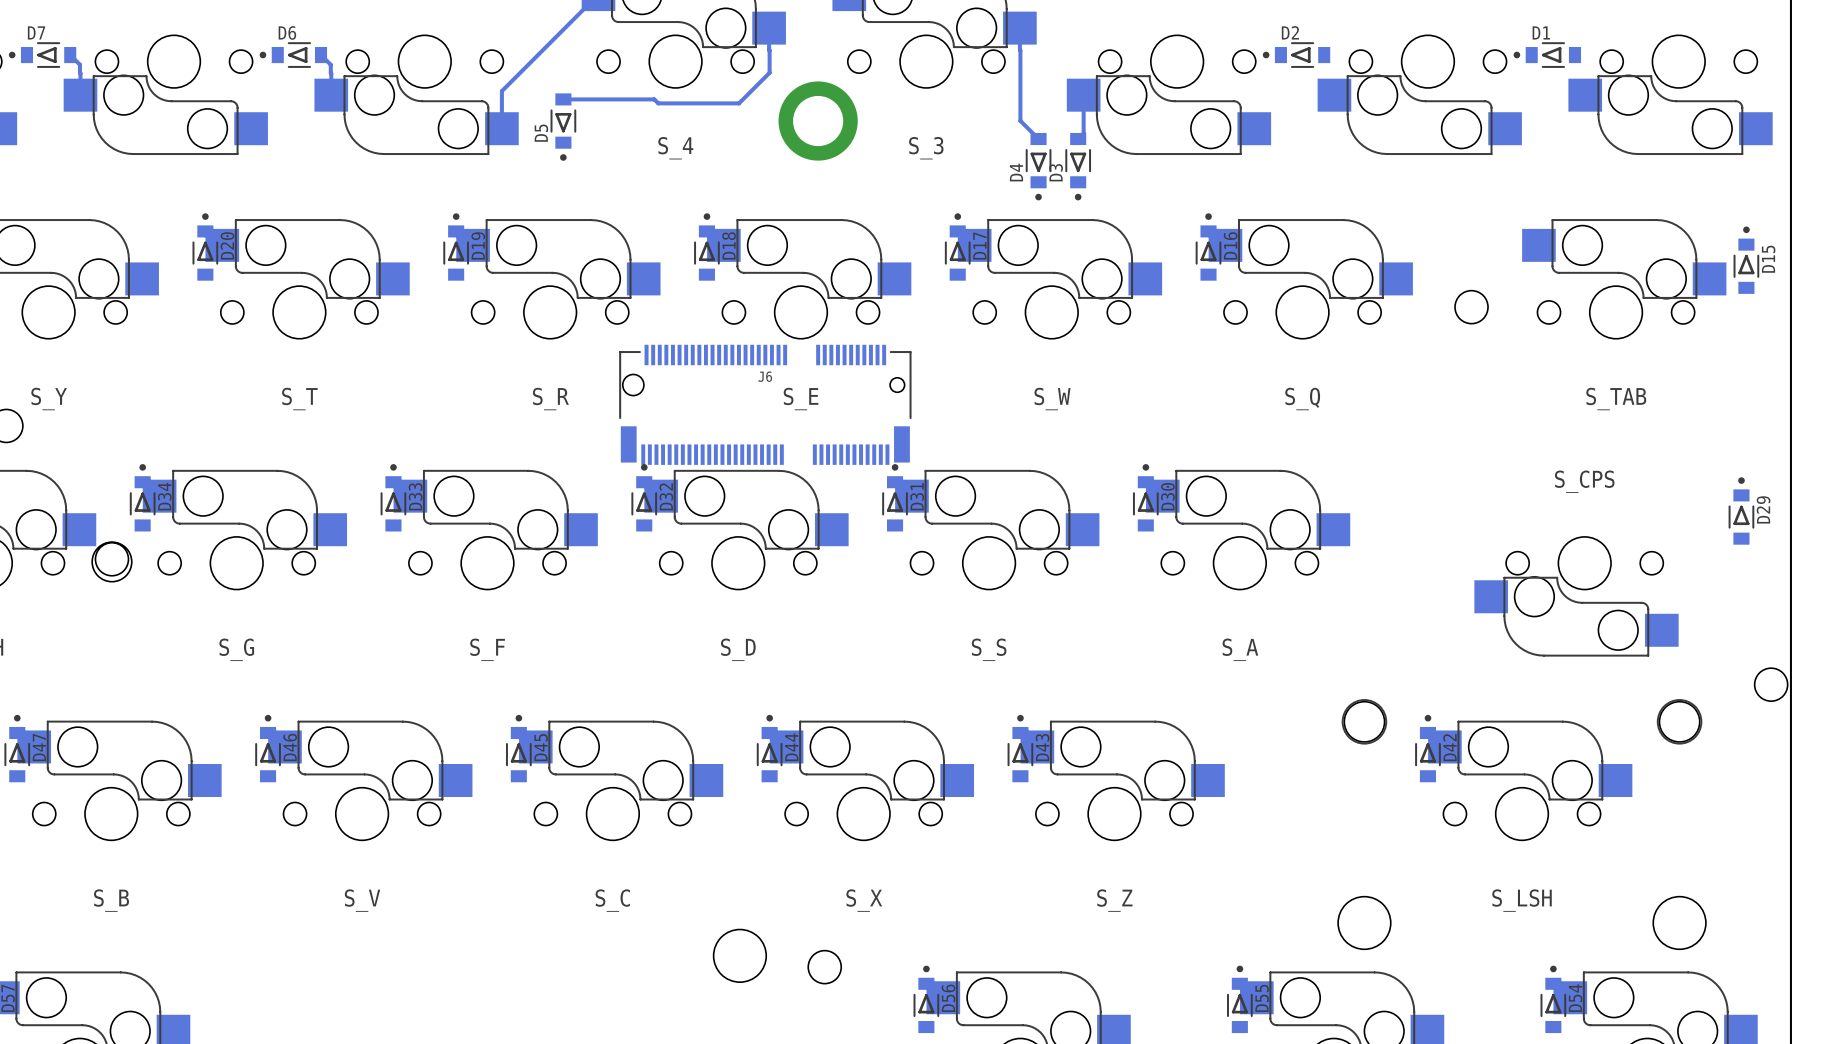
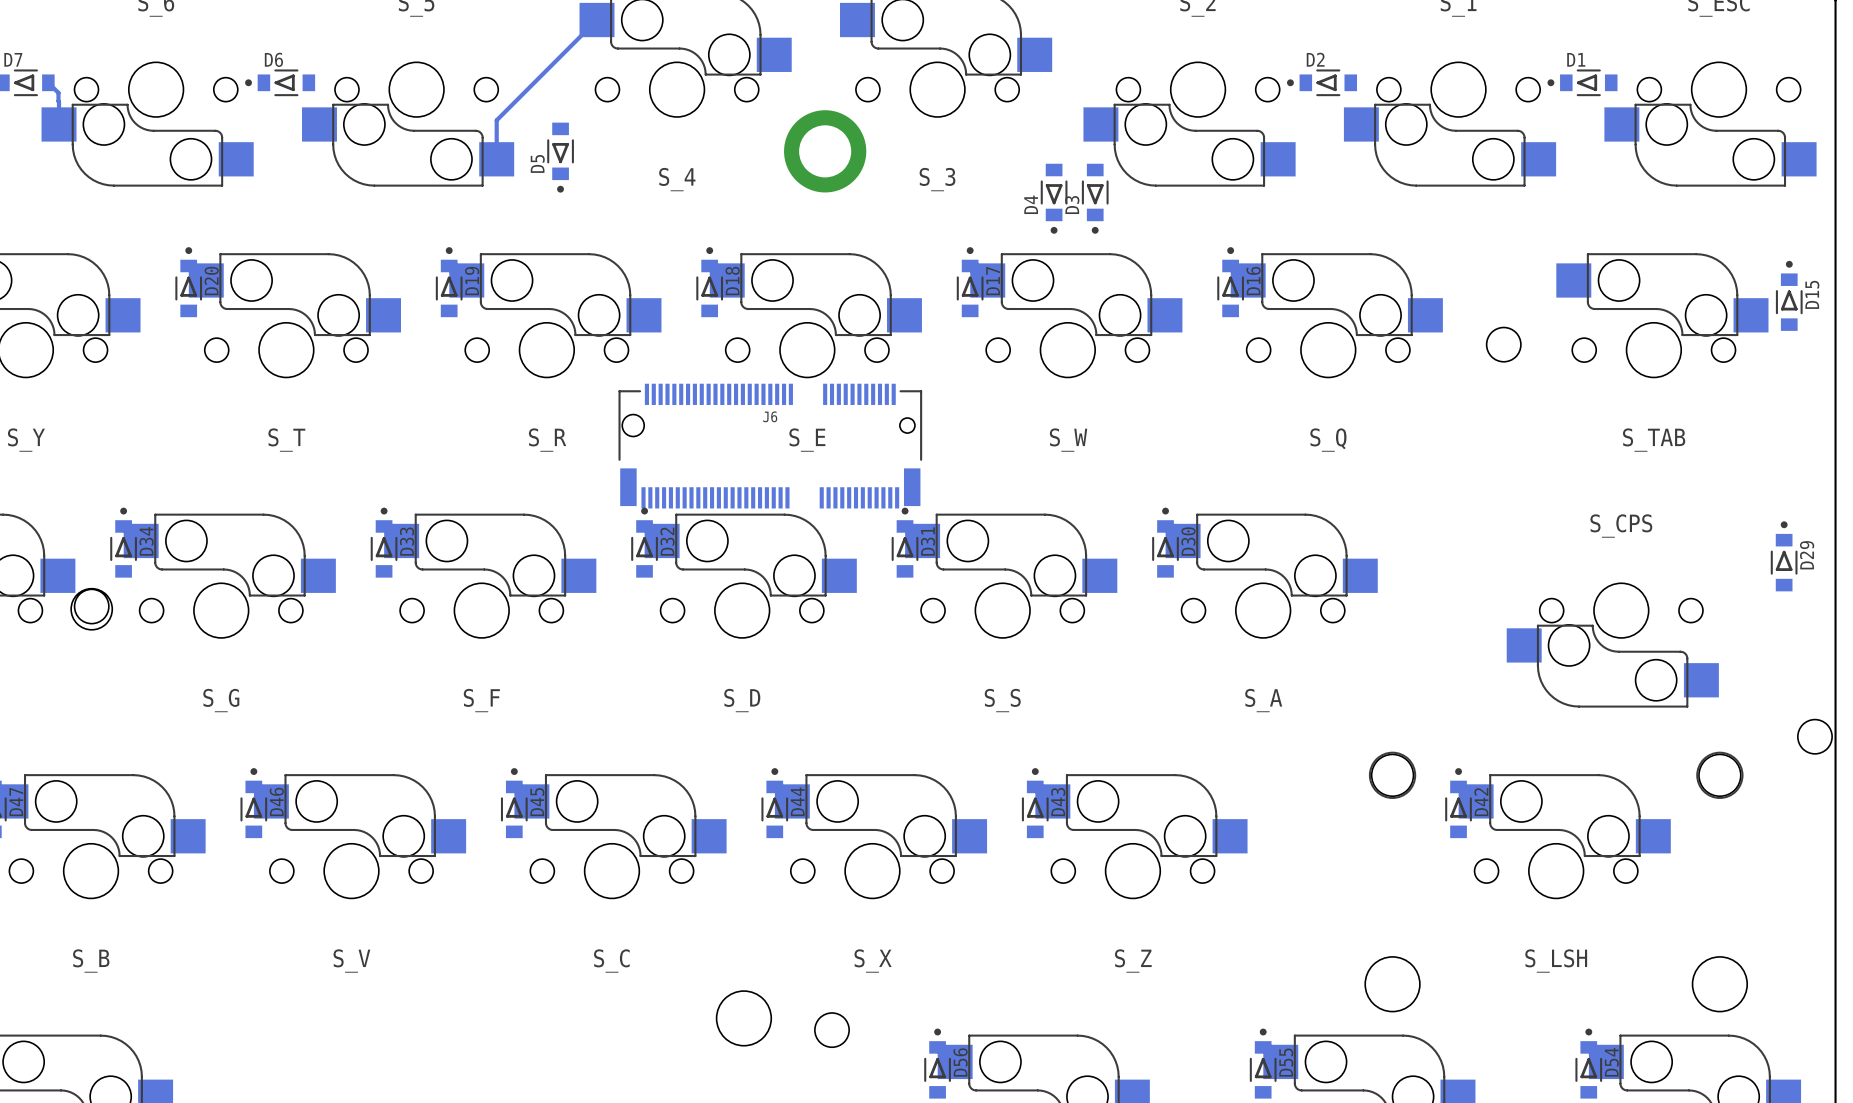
bottom track: (769, 28) (769, 72) (739, 103) (658, 103) (654, 99) (563, 99) -> none
bottom track: (1019, 28) (1020, 120) (1038, 139) -> none
bottom track: (321, 55) (330, 64) (331, 95) -> none
bottom track: (1083, 95) (1083, 133) (1078, 139) -> none

